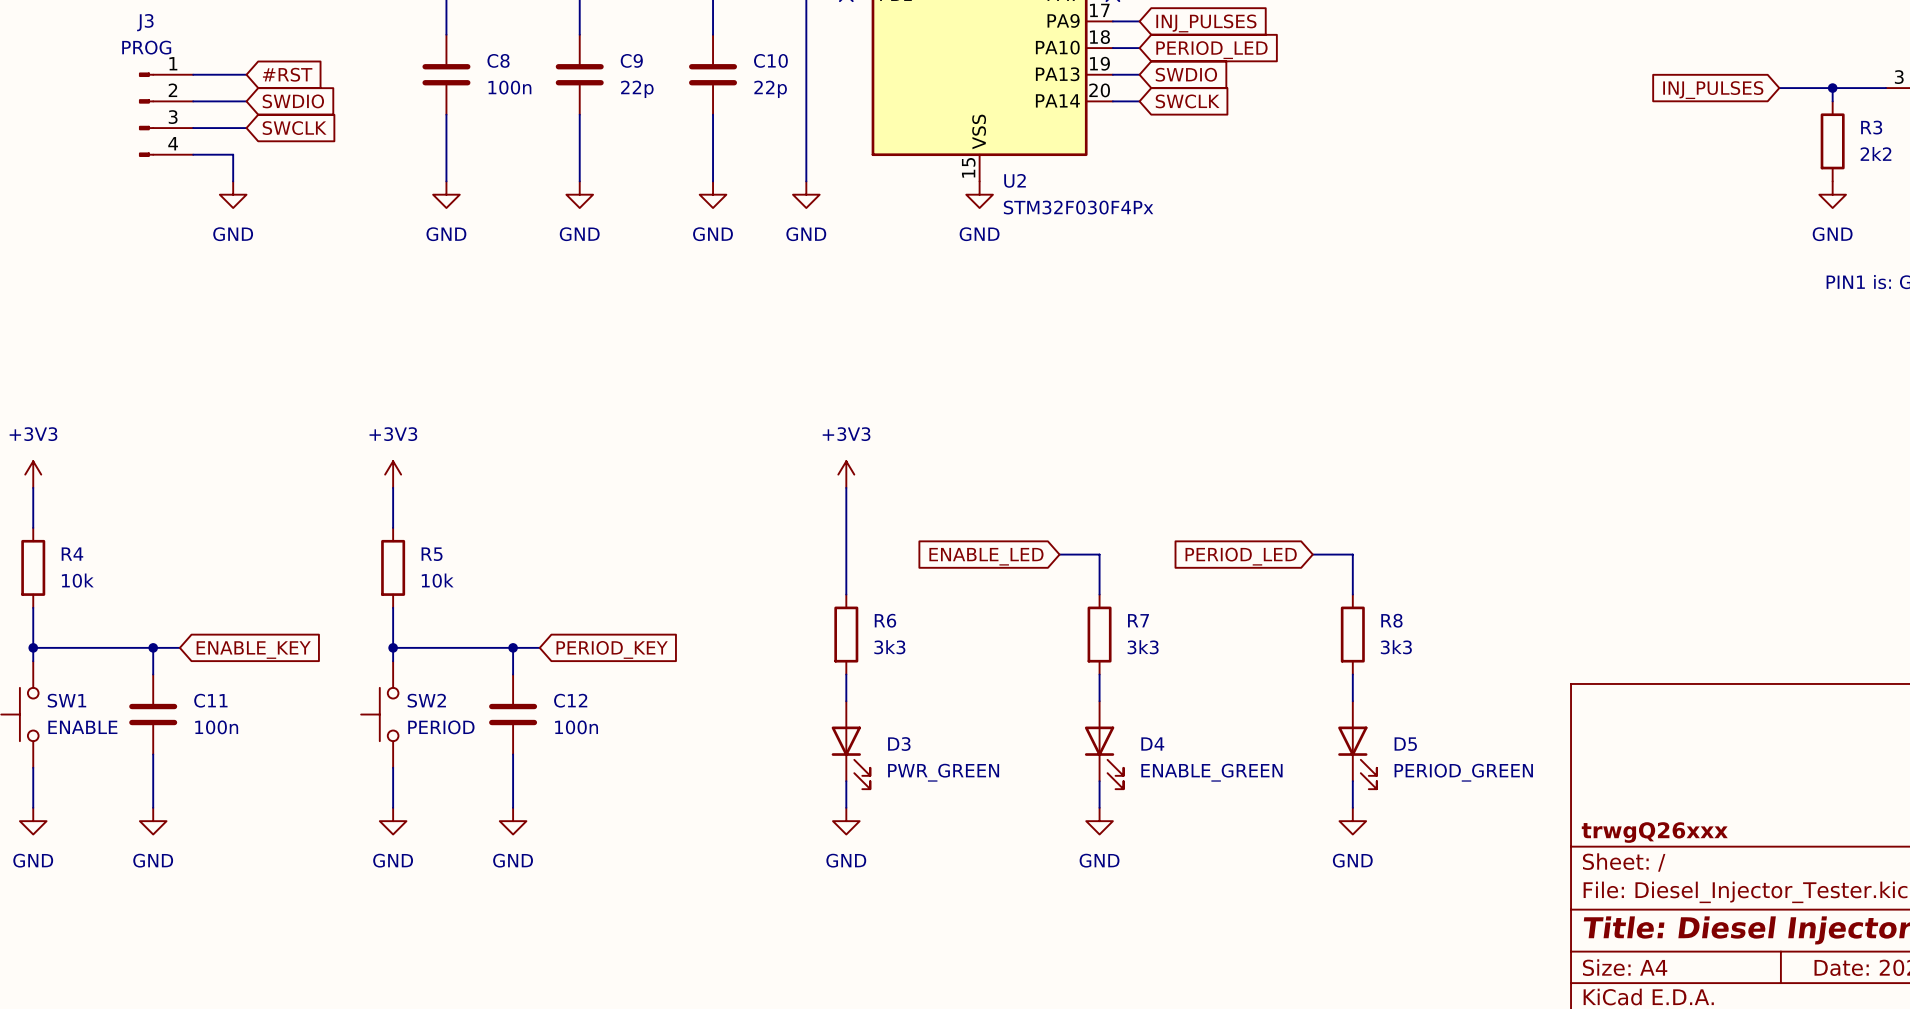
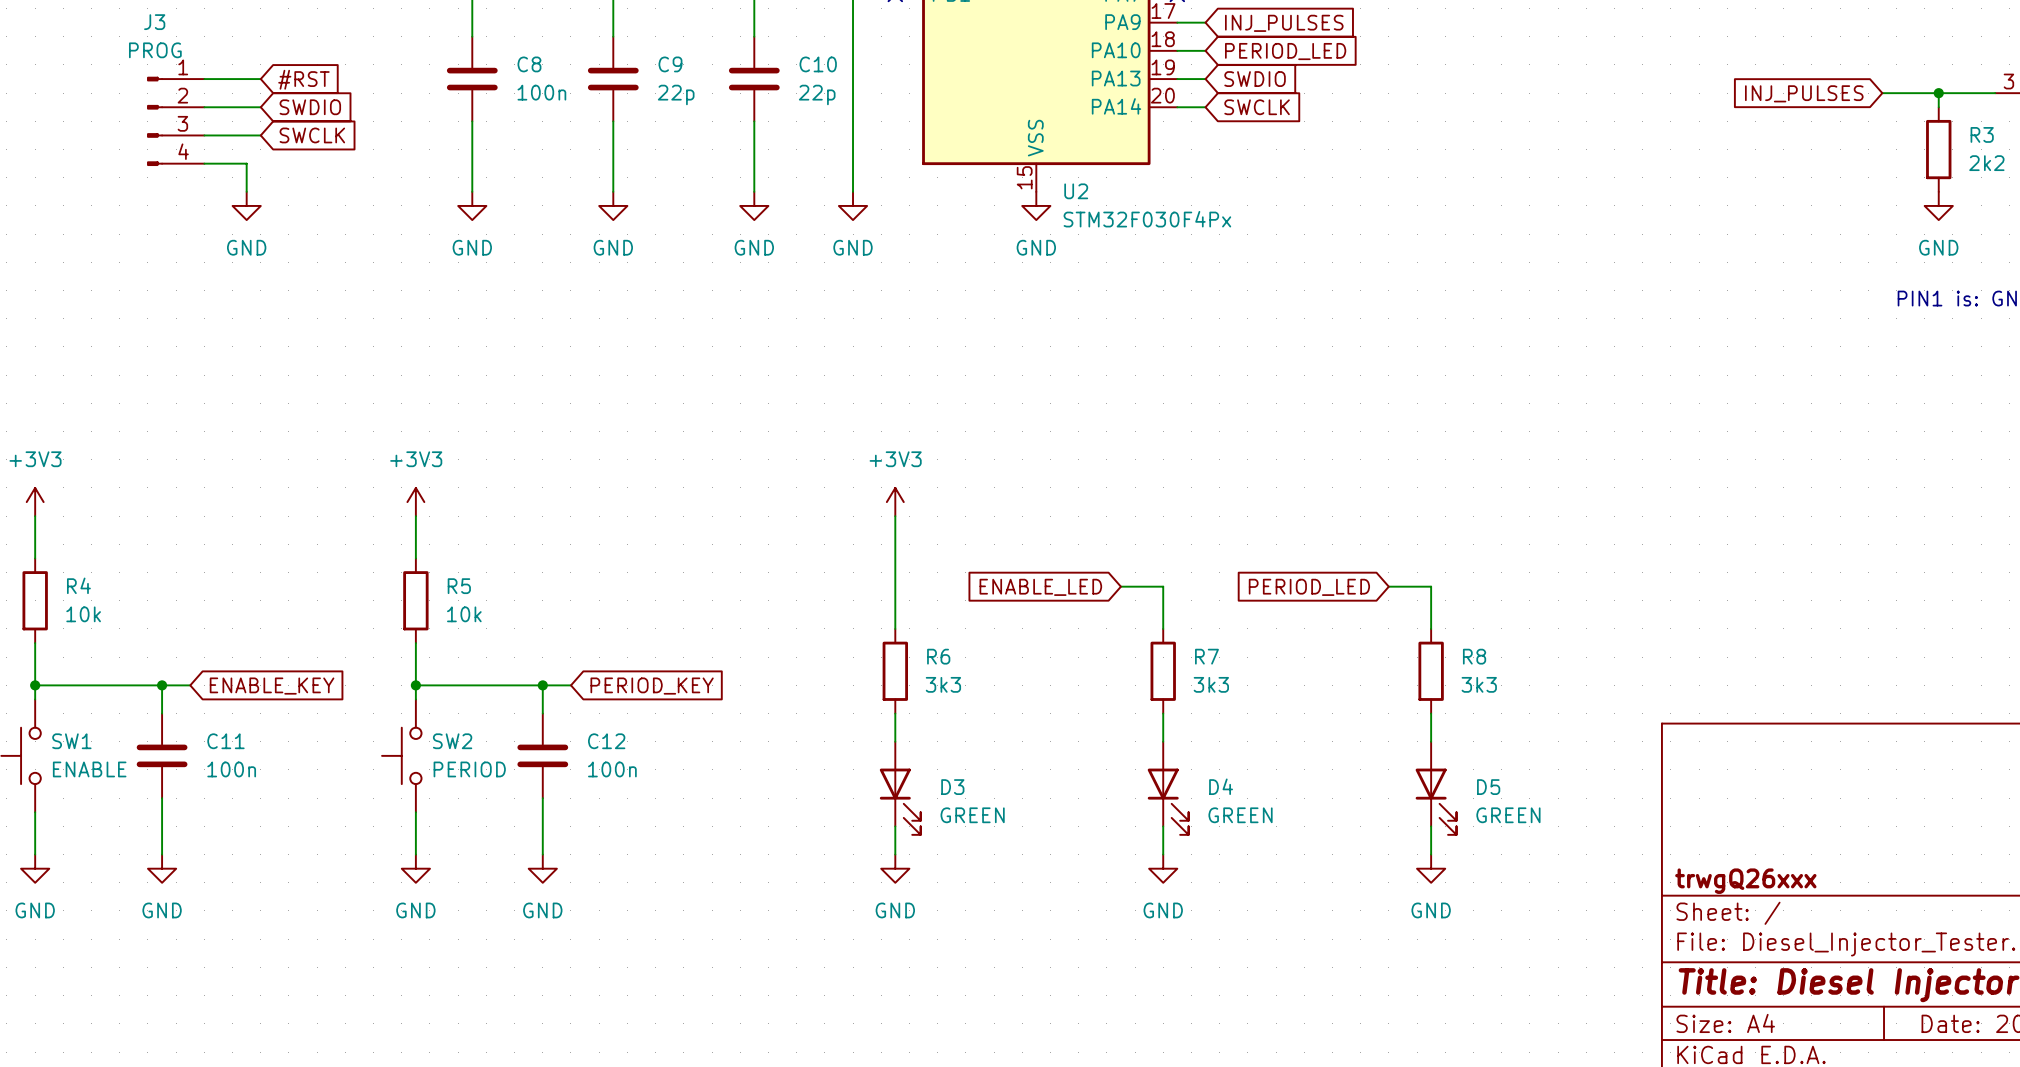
D3 value: PWR_GREEN (943, 772) -> GREEN (972, 815)
D4 value: ENABLE_GREEN (1211, 772) -> GREEN (1240, 815)
D5 value: PERIOD_GREEN (1463, 772) -> GREEN (1508, 815)

